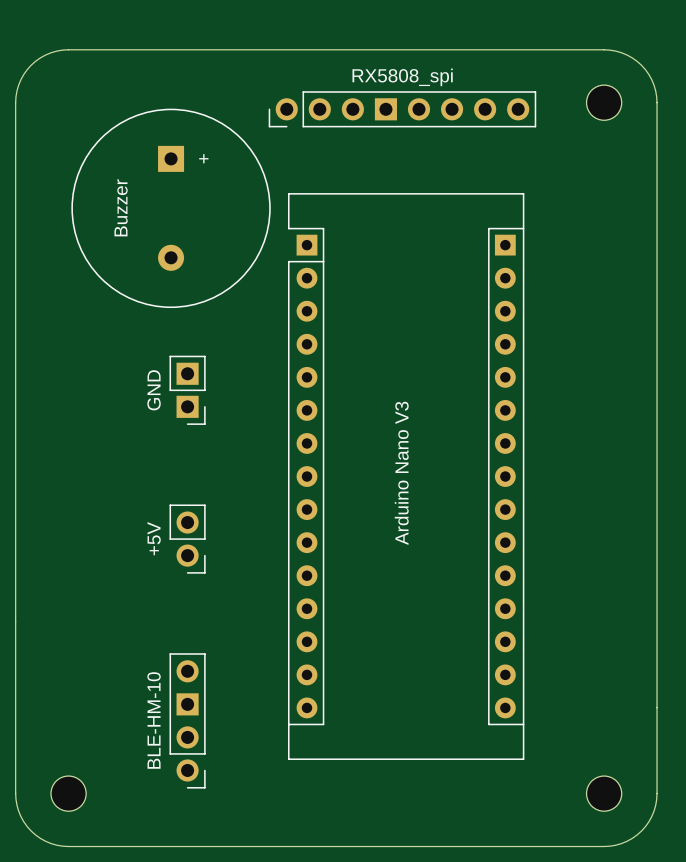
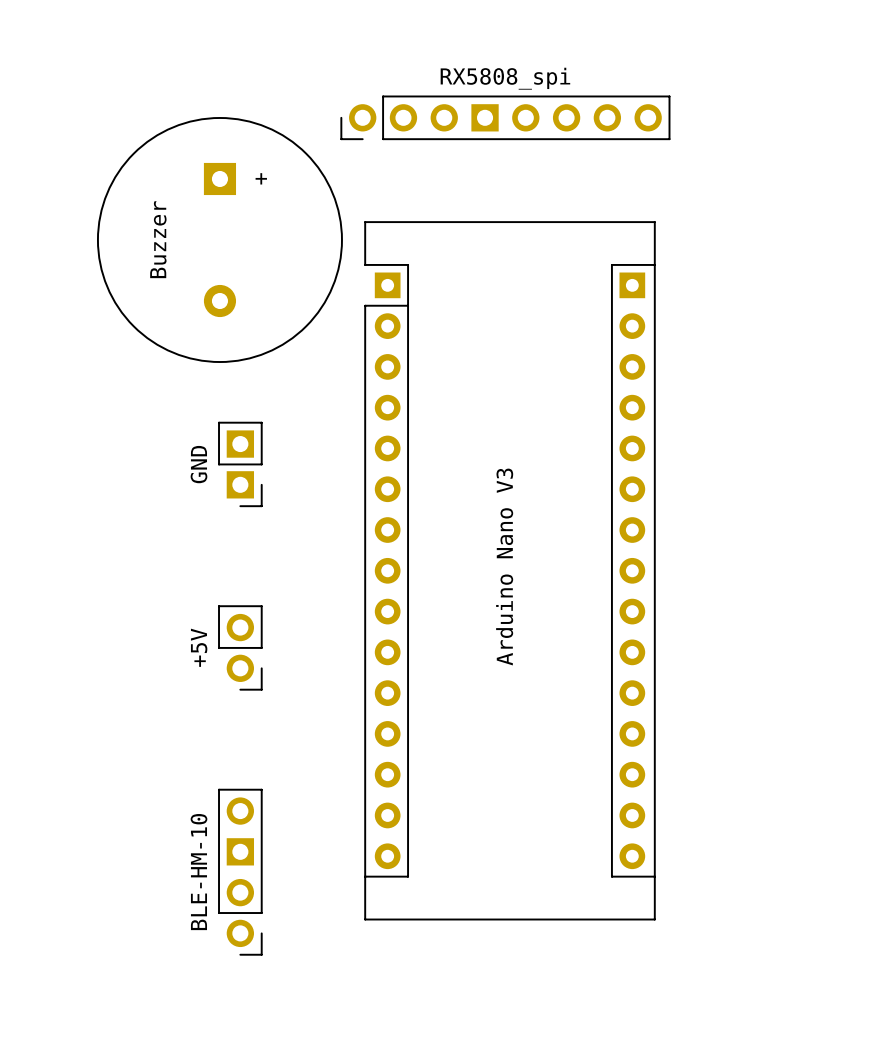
board edge: (68, 49) (604, 49) (627, 55) (645, 69) (654, 85) (657, 102) (657, 793) (651, 816) (637, 834) (621, 843) (604, 846) (68, 846) (45, 841) (27, 826) (18, 811) (15, 793) (15, 102) (18, 85) (31, 65) (51, 52) (68, 49) -> none
part: (604, 102) -> none
part: (68, 793) -> none
part: (604, 793) -> none

